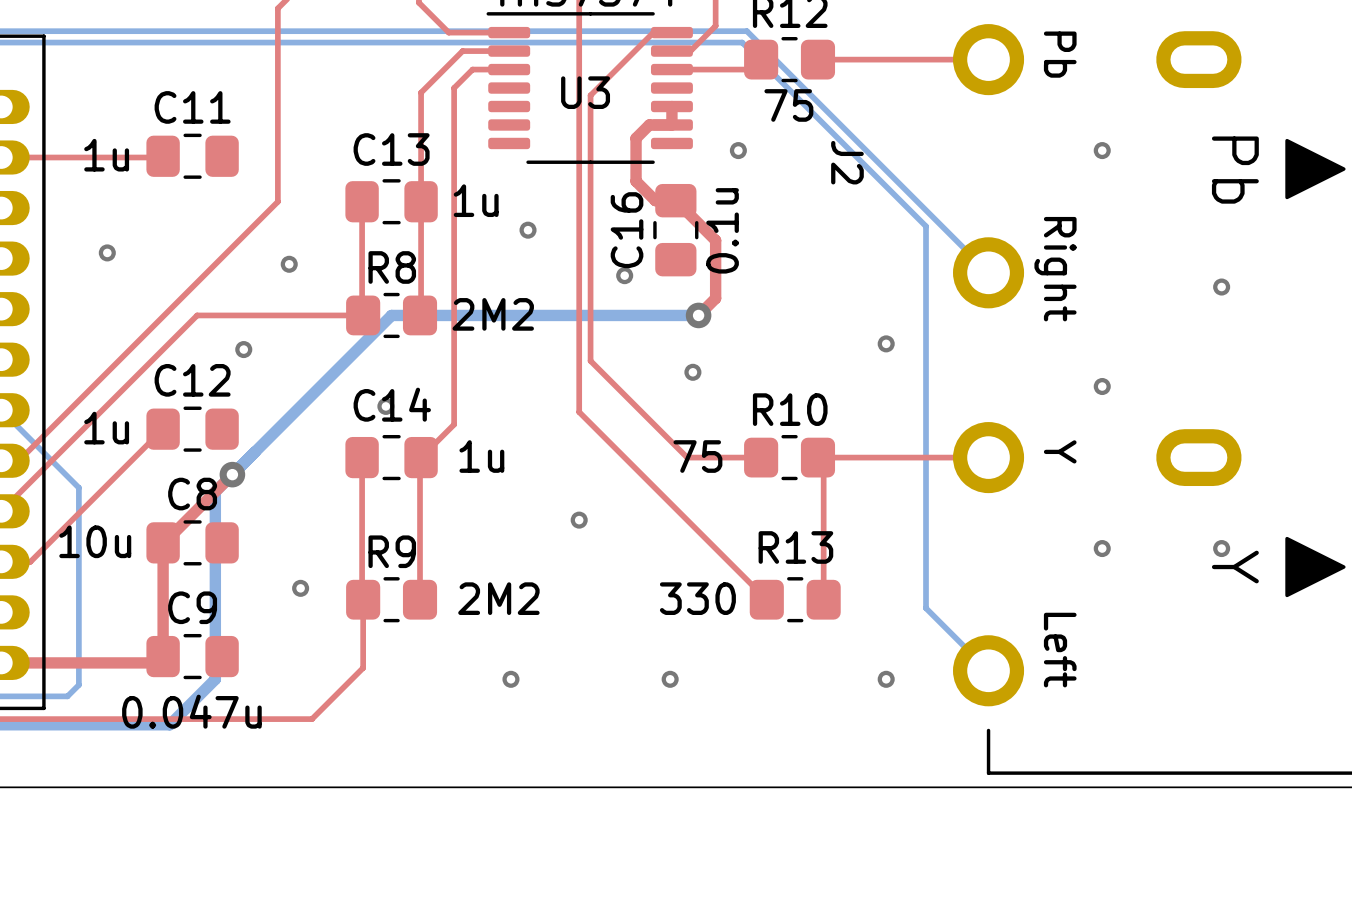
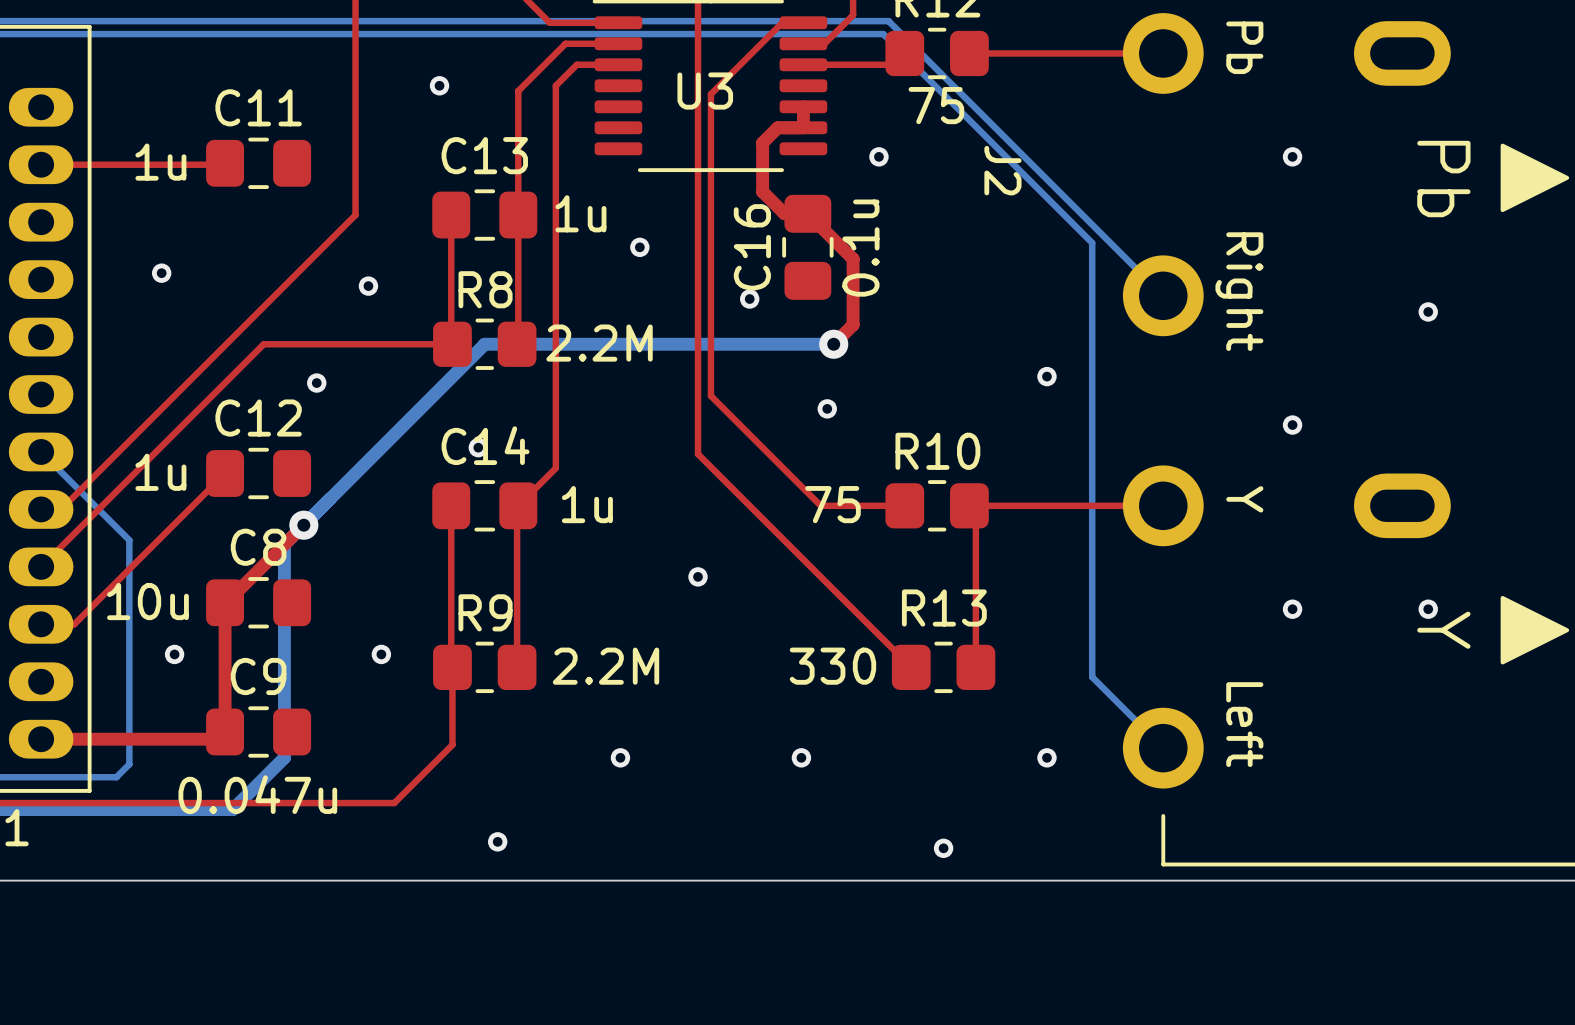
via: none -> (439, 85)
R8 value: 2M2 (493, 314) -> 2.2M (599, 343)
via: none -> (174, 654)
R9 value: 2M2 (498, 598) -> 2.2M (606, 666)
via: none -> (497, 841)
via: none -> (943, 848)

